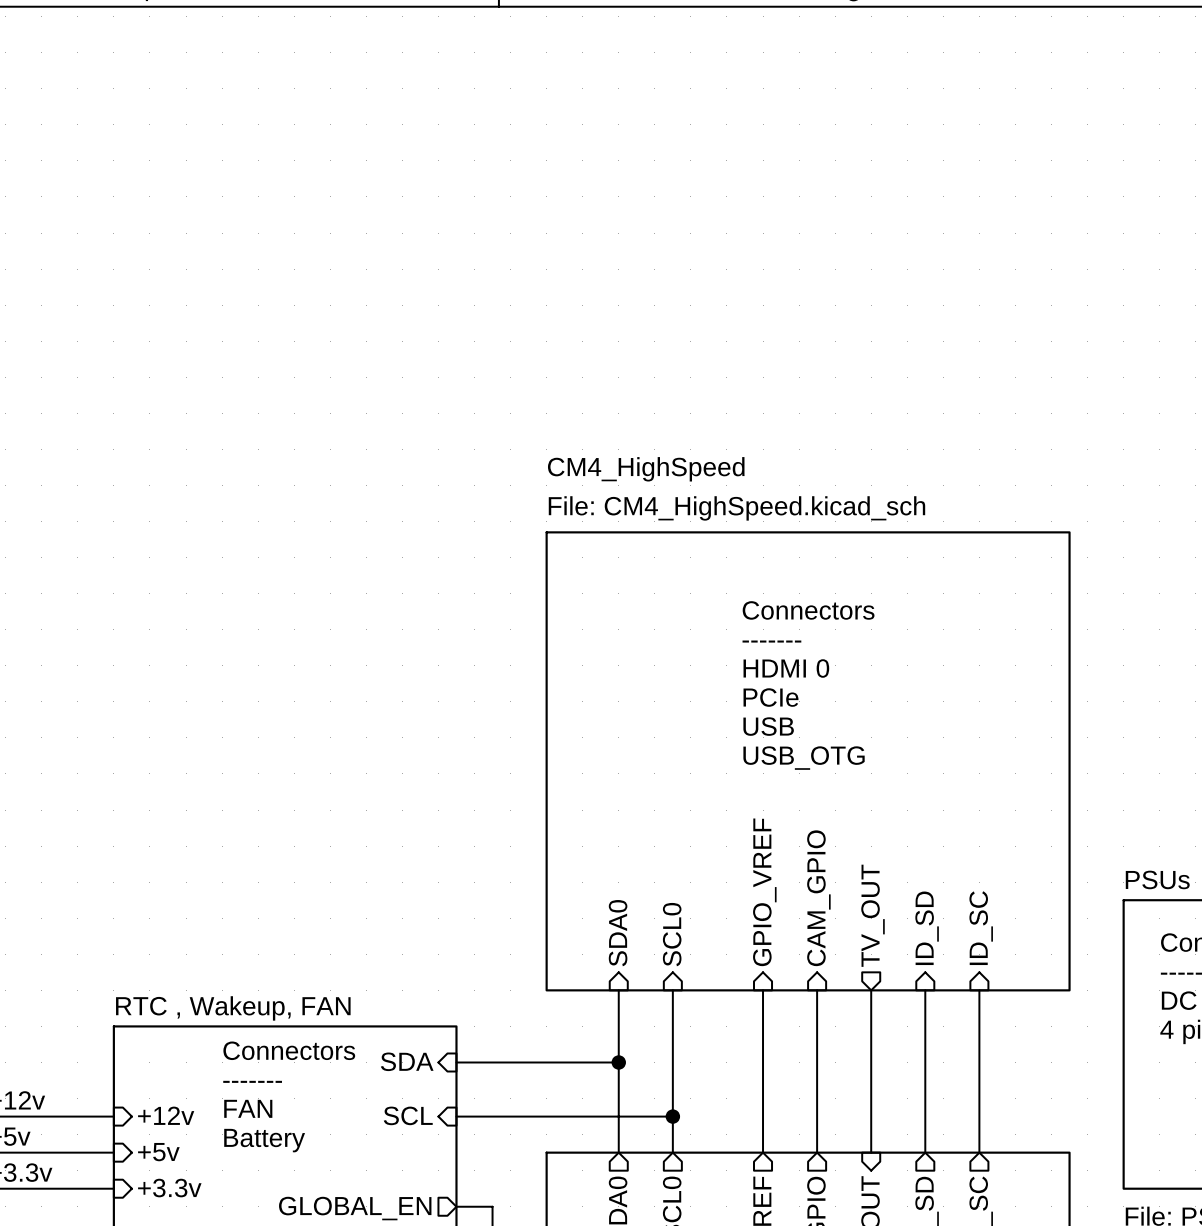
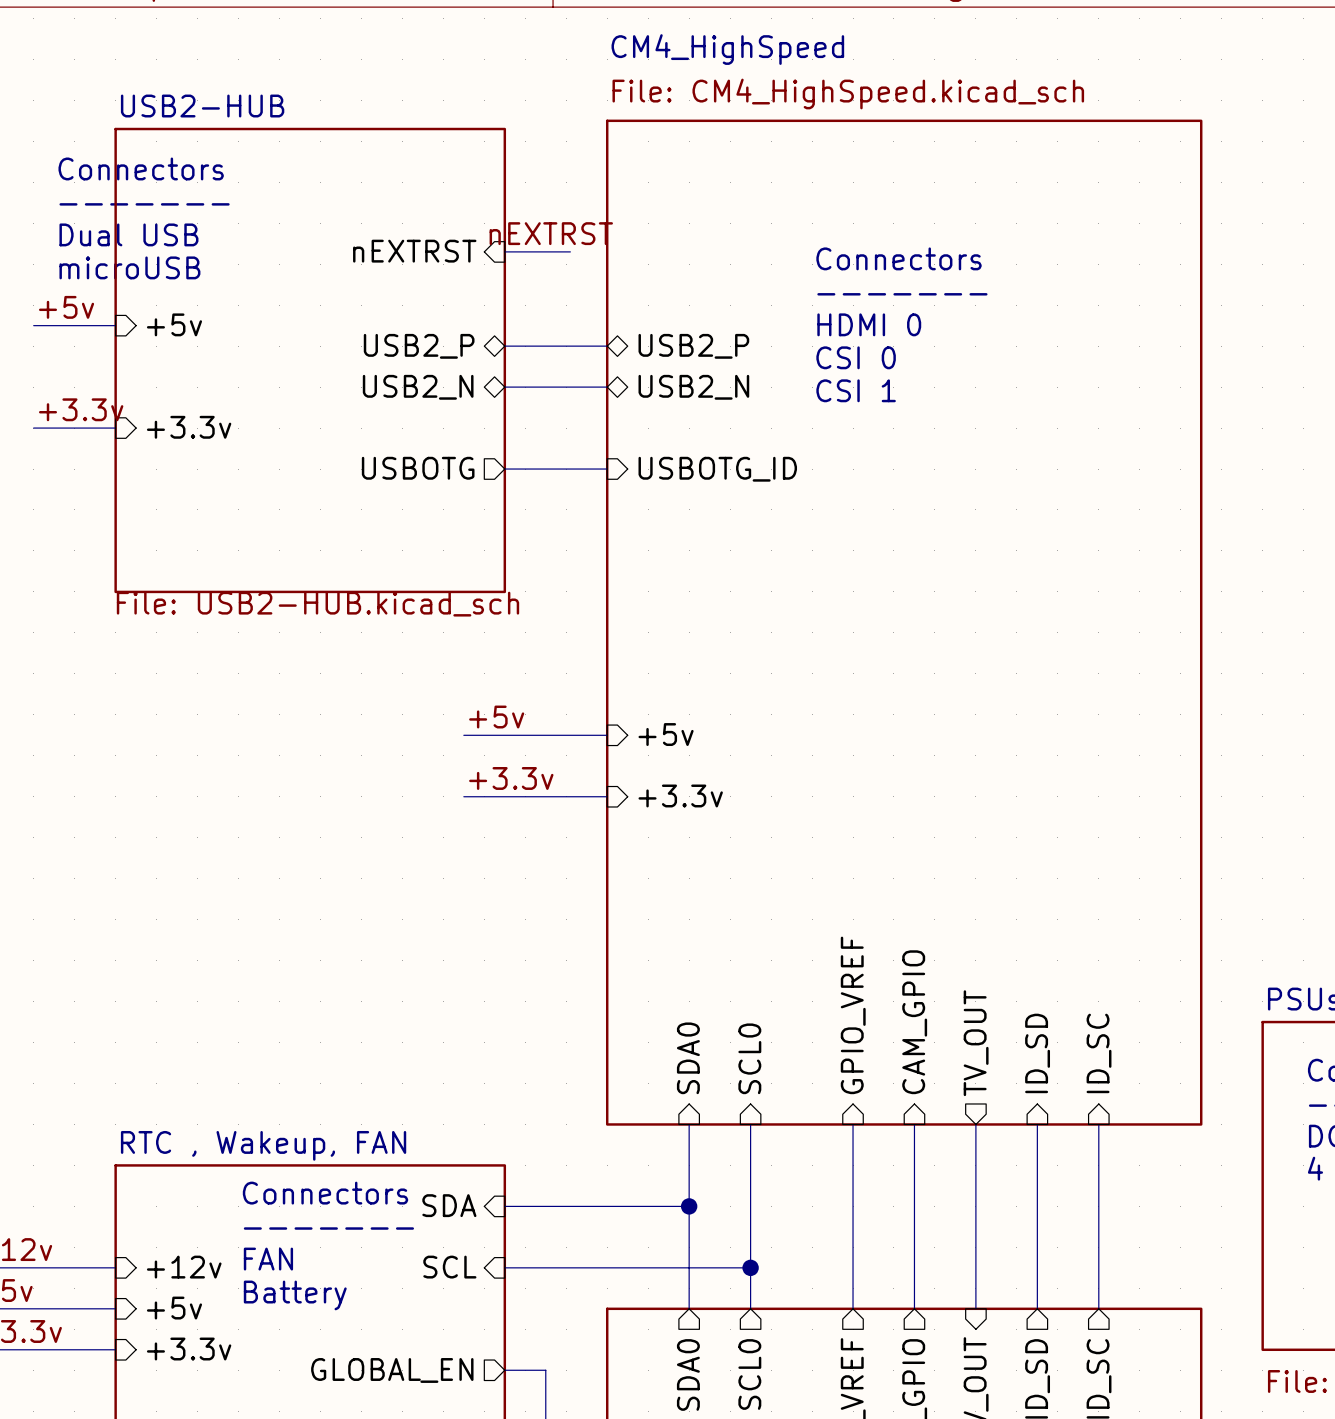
text: none -> Connectors (141, 168)
text: none -> ------- (144, 204)
text: none -> Dual USB (128, 234)
label: none -> nEXTRST (551, 233)
sheet pin: none -> nEXTRST (414, 251)
wire: none -> (504, 251) (570, 251)
text: none -> Connectors (899, 258)
text: none -> microUSB (129, 267)
text: none -> ------- (902, 294)
label: none -> +5v (66, 307)
sheet pin: none -> +5v (174, 324)
text: none -> HDMI 0 (869, 324)
wire: none -> (33, 325) (115, 325)
wire: none -> (504, 346) (607, 346)
sheet pin: none -> USB2_P (419, 346)
sheet pin: none -> USB2_P (693, 346)
text: none -> CSI 0 (856, 357)
sheet USB2-HUB: none -> File: USB2-HUB.kicad_sch (310, 360)
wire: none -> (504, 387) (607, 387)
sheet pin: none -> USB2_N (418, 387)
sheet pin: none -> USB2_N (693, 387)
text: none -> CSI 1 (856, 390)
label: none -> +3.3v (81, 409)
sheet pin: none -> +3.3v (189, 427)
wire: none -> (33, 428) (115, 428)
sheet pin: none -> USBOTG (418, 468)
wire: none -> (504, 469) (607, 469)
sheet pin: none -> USBOTG_ID (717, 469)
sheet CM4_HighSpeed name position: CM4_HighSpeed (646, 469) -> CM4_HighSpeed (727, 49)
sheet CM4_HighSpeed value position: File: CM4_HighSpeed.kicad_sch (736, 508) -> File: CM4_HighSpeed.kicad_sch (848, 93)
sheet CM4_HighSpeed shape: [545, 531, 1071, 992] -> [605, 119, 1203, 1126]
text: Connectors (808, 610) -> none
label: none -> +5v (496, 717)
text: ------- (771, 641) -> none
wire: none -> (463, 735) (607, 735)
sheet pin: none -> +5v (666, 734)
text: HDMI 0 (786, 668) -> none
label: none -> +3.3v (511, 778)
text: PCIe (771, 697) -> none
wire: none -> (463, 796) (607, 796)
sheet pin: none -> +3.3v (680, 795)
text: USB (768, 726) -> none
text: USB_OTG (804, 758) -> none

